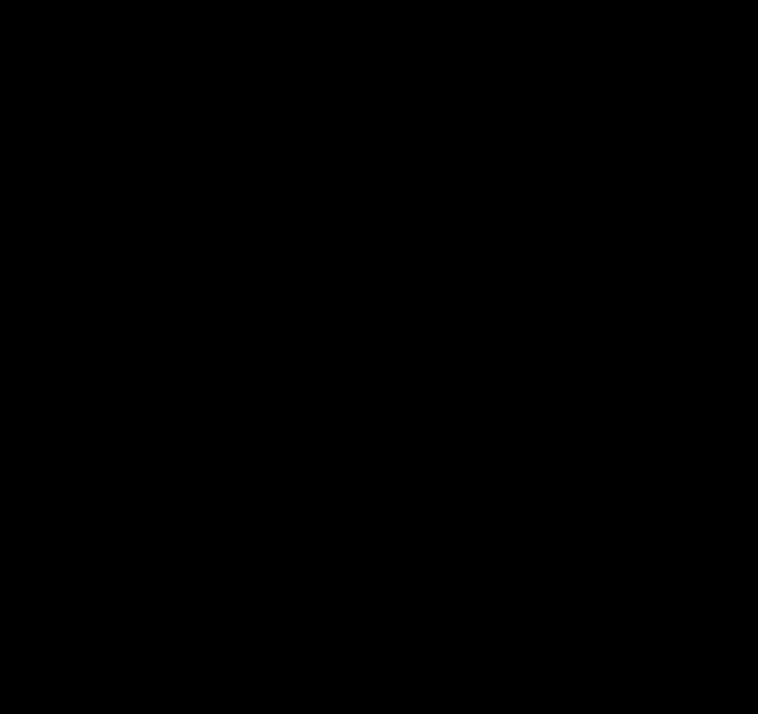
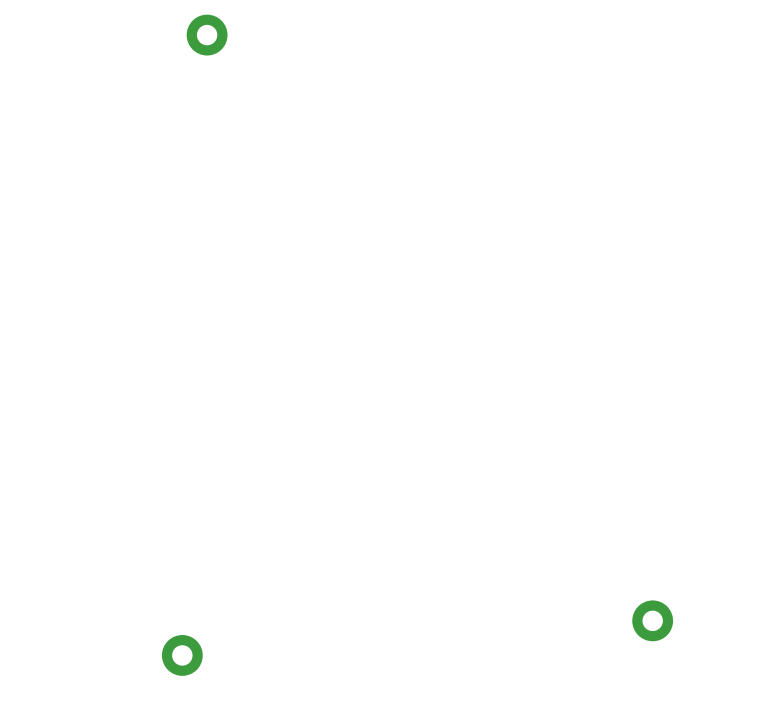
via: none -> (207, 35)
via: none -> (652, 620)
via: none -> (182, 655)

